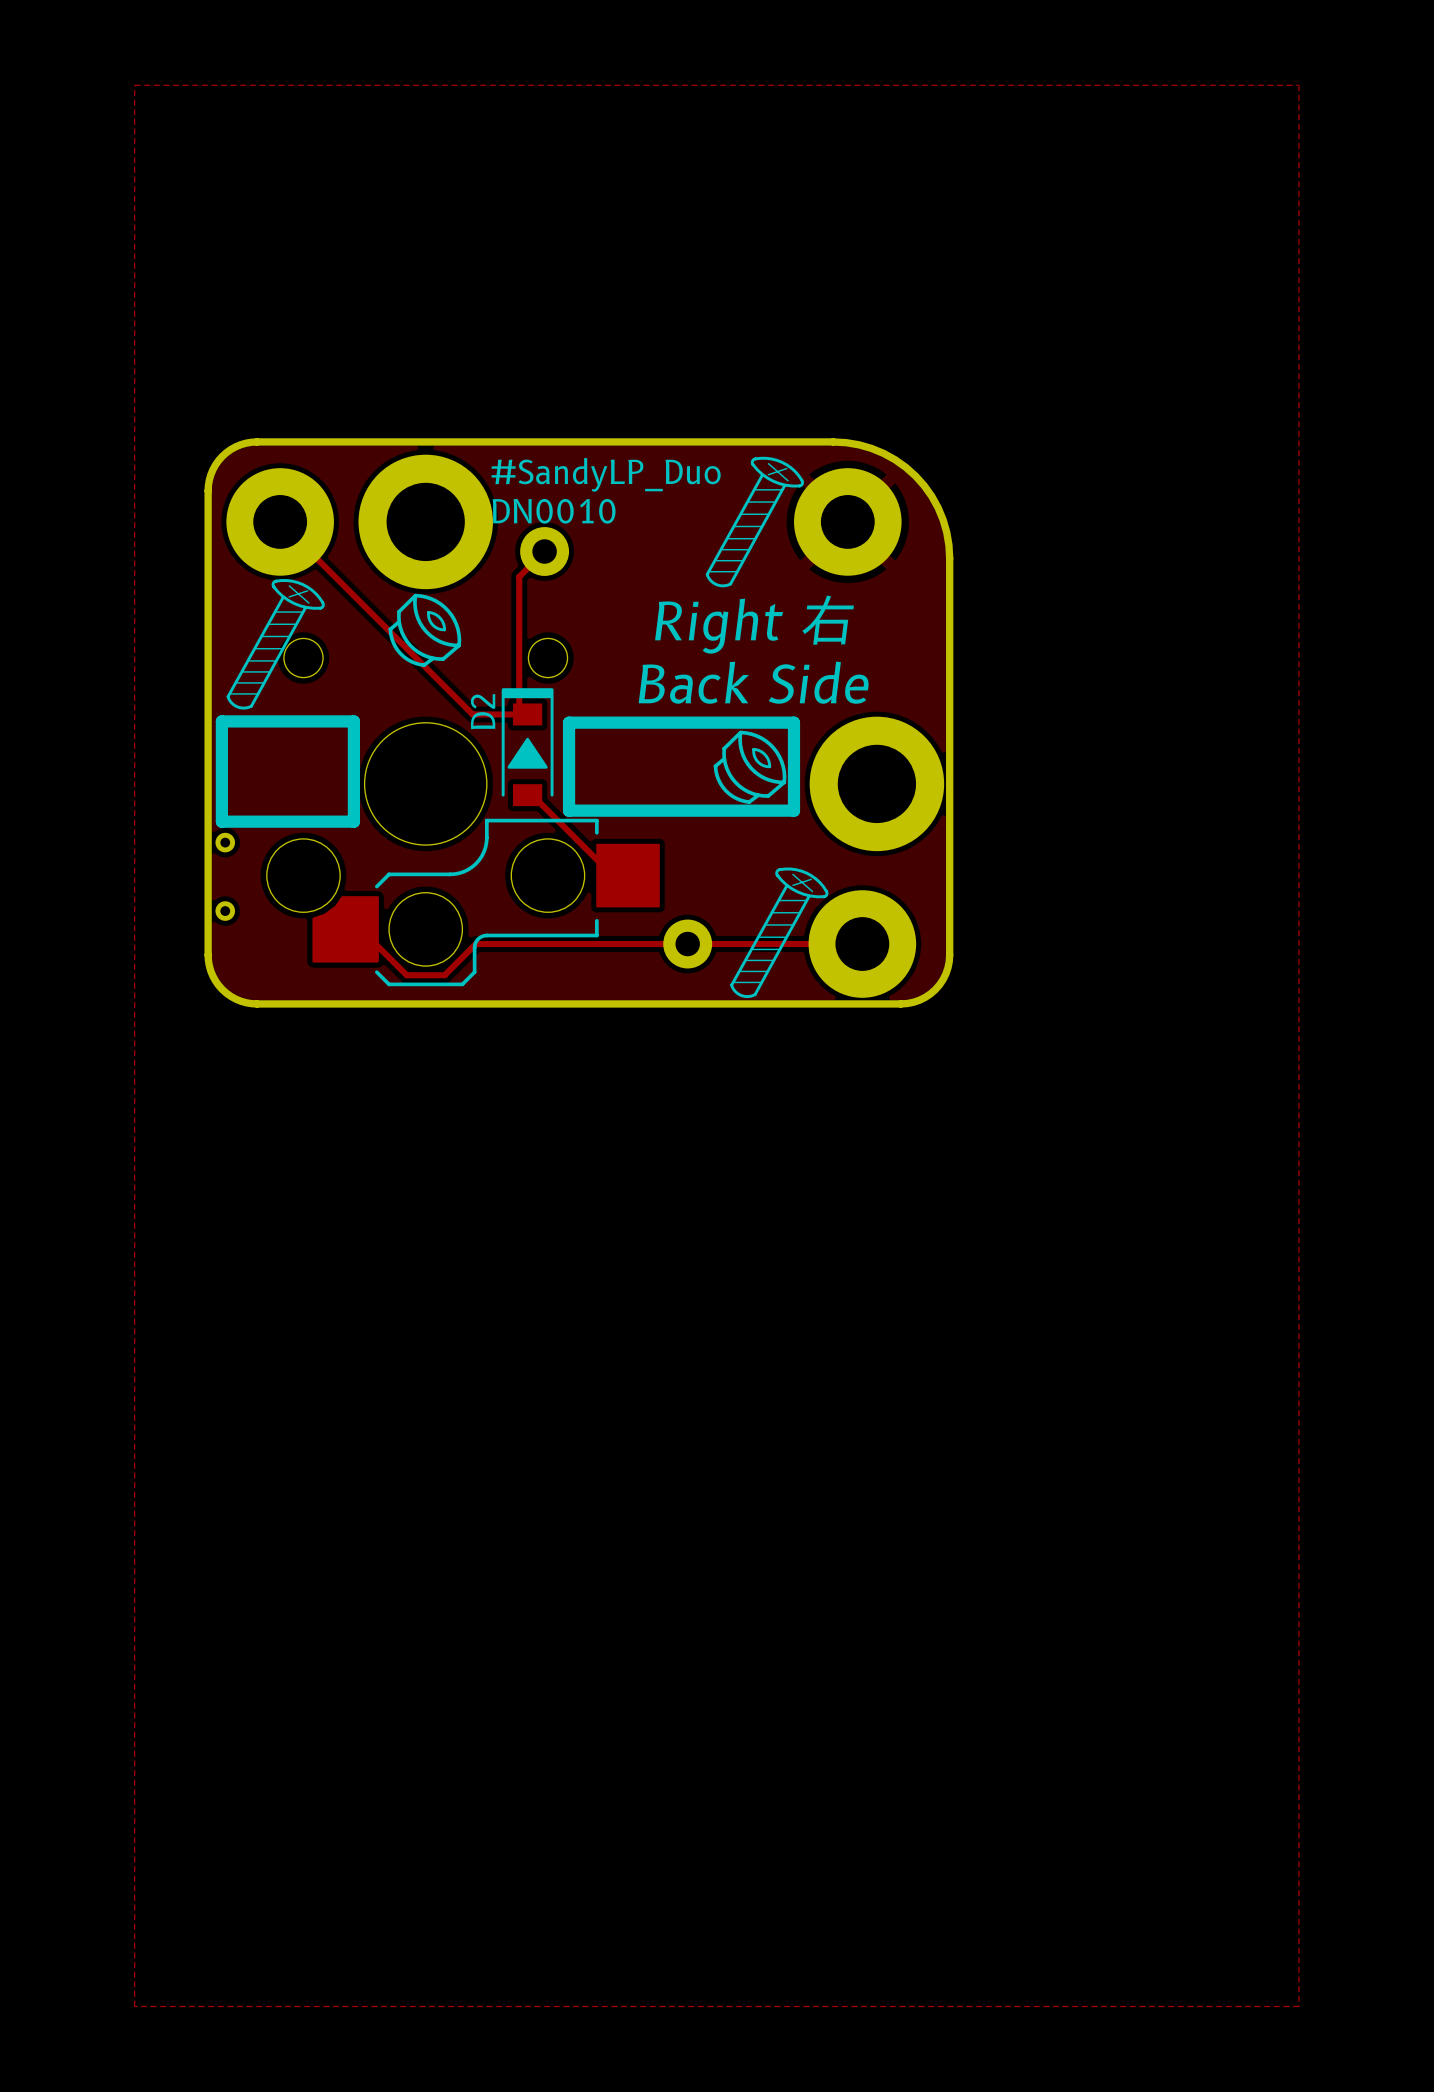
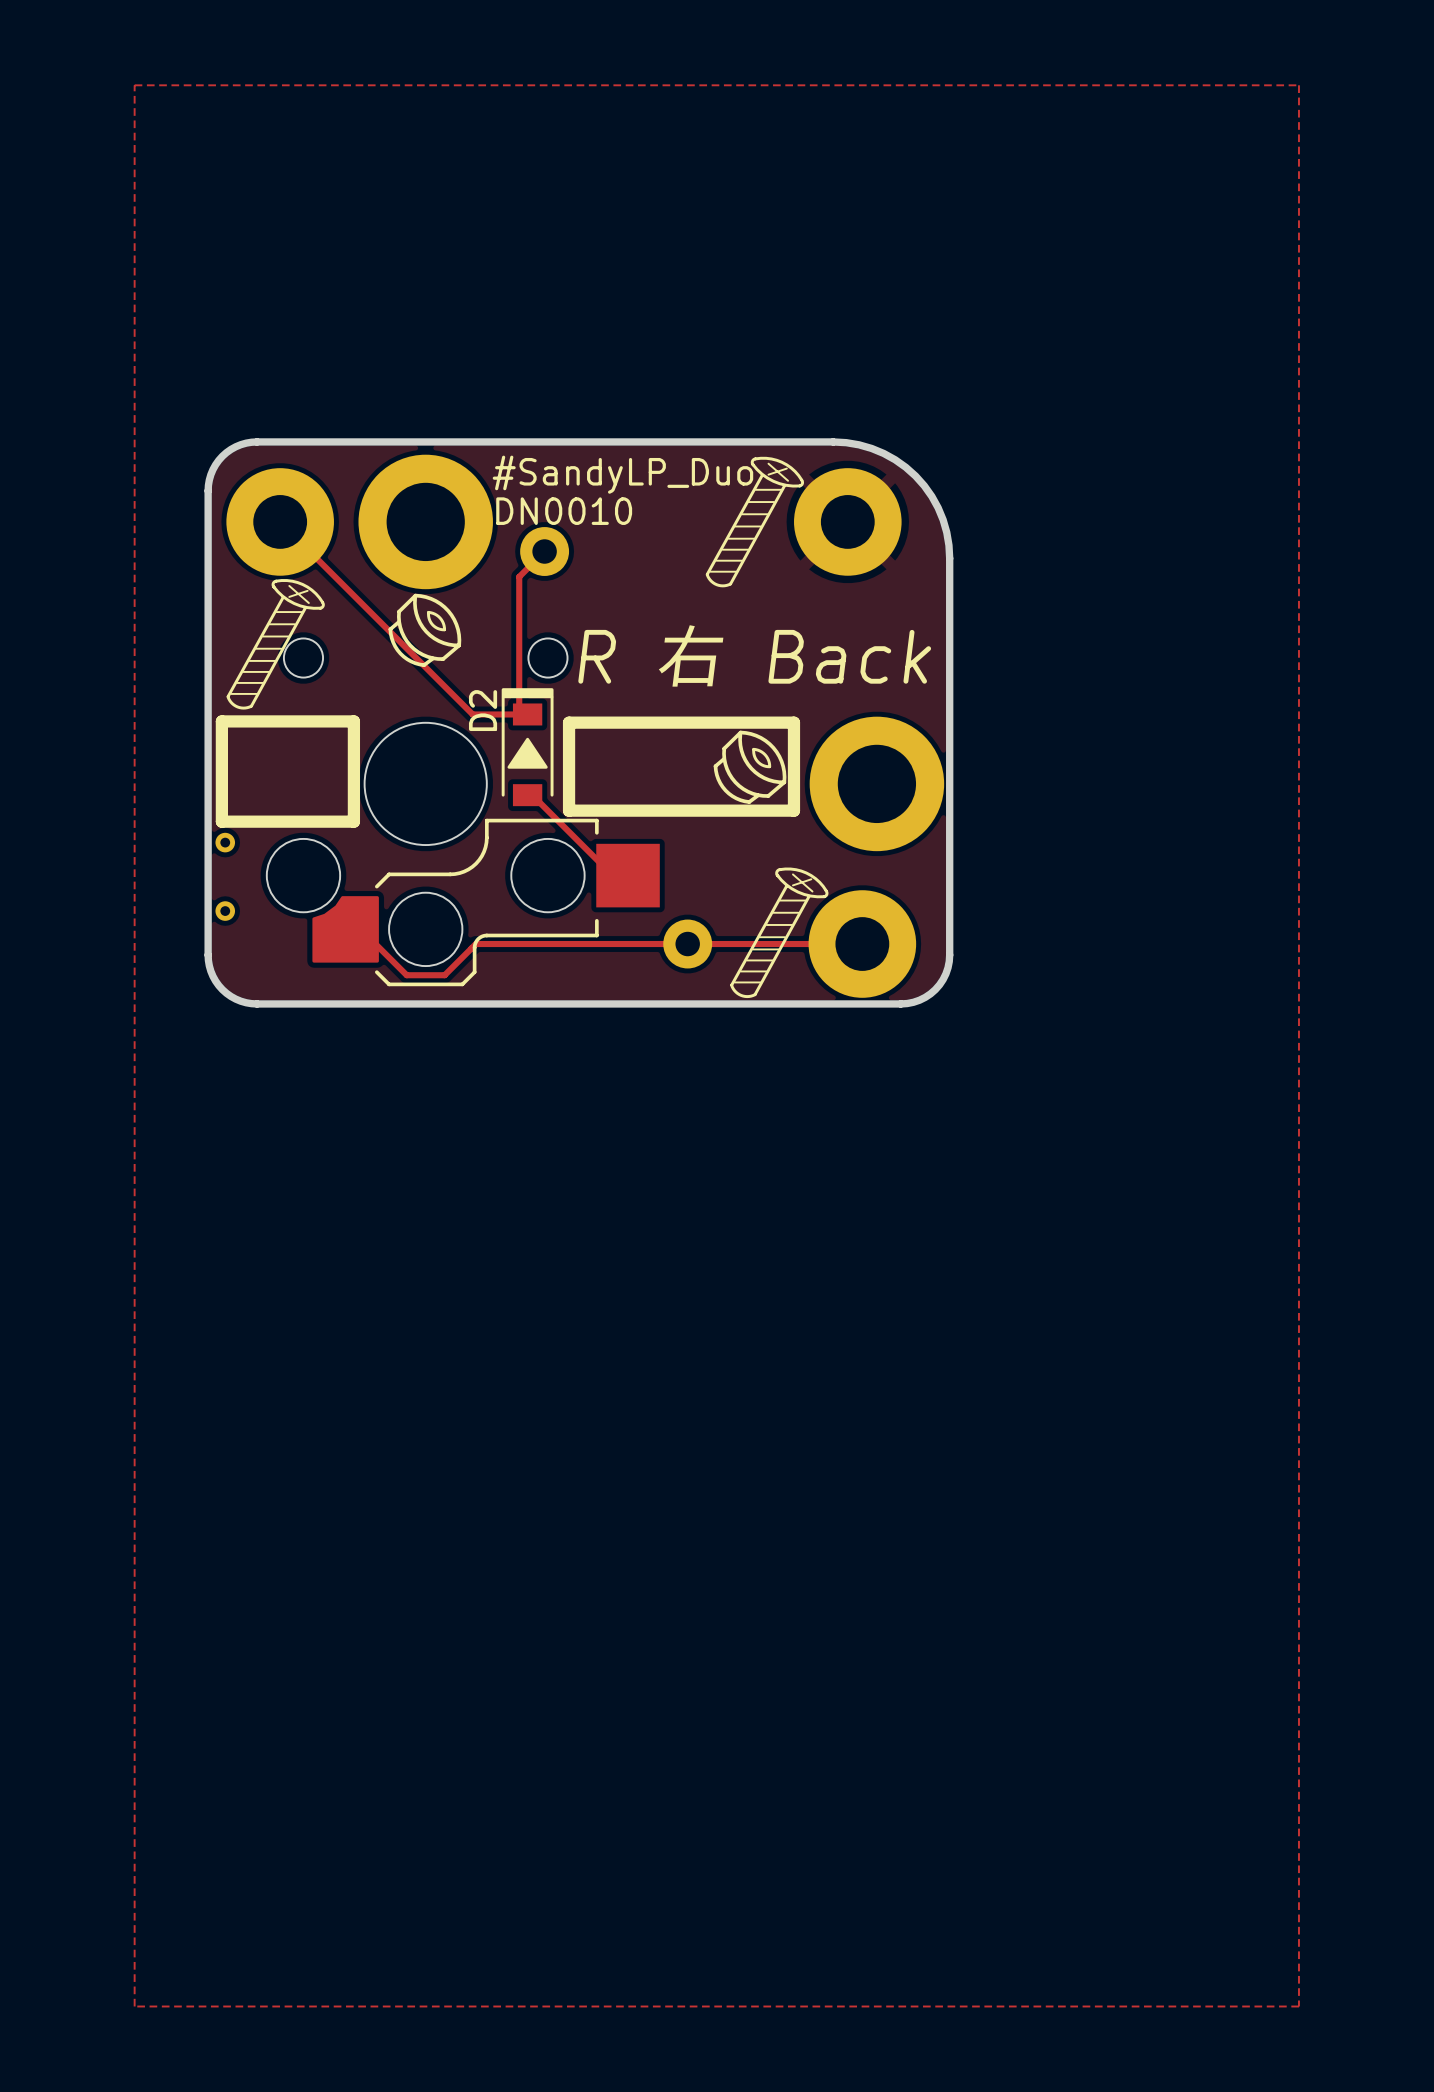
text: Right 右 (754, 624) -> none
text: none -> R 右 Back (754, 655)
text: Back Side (753, 682) -> none

